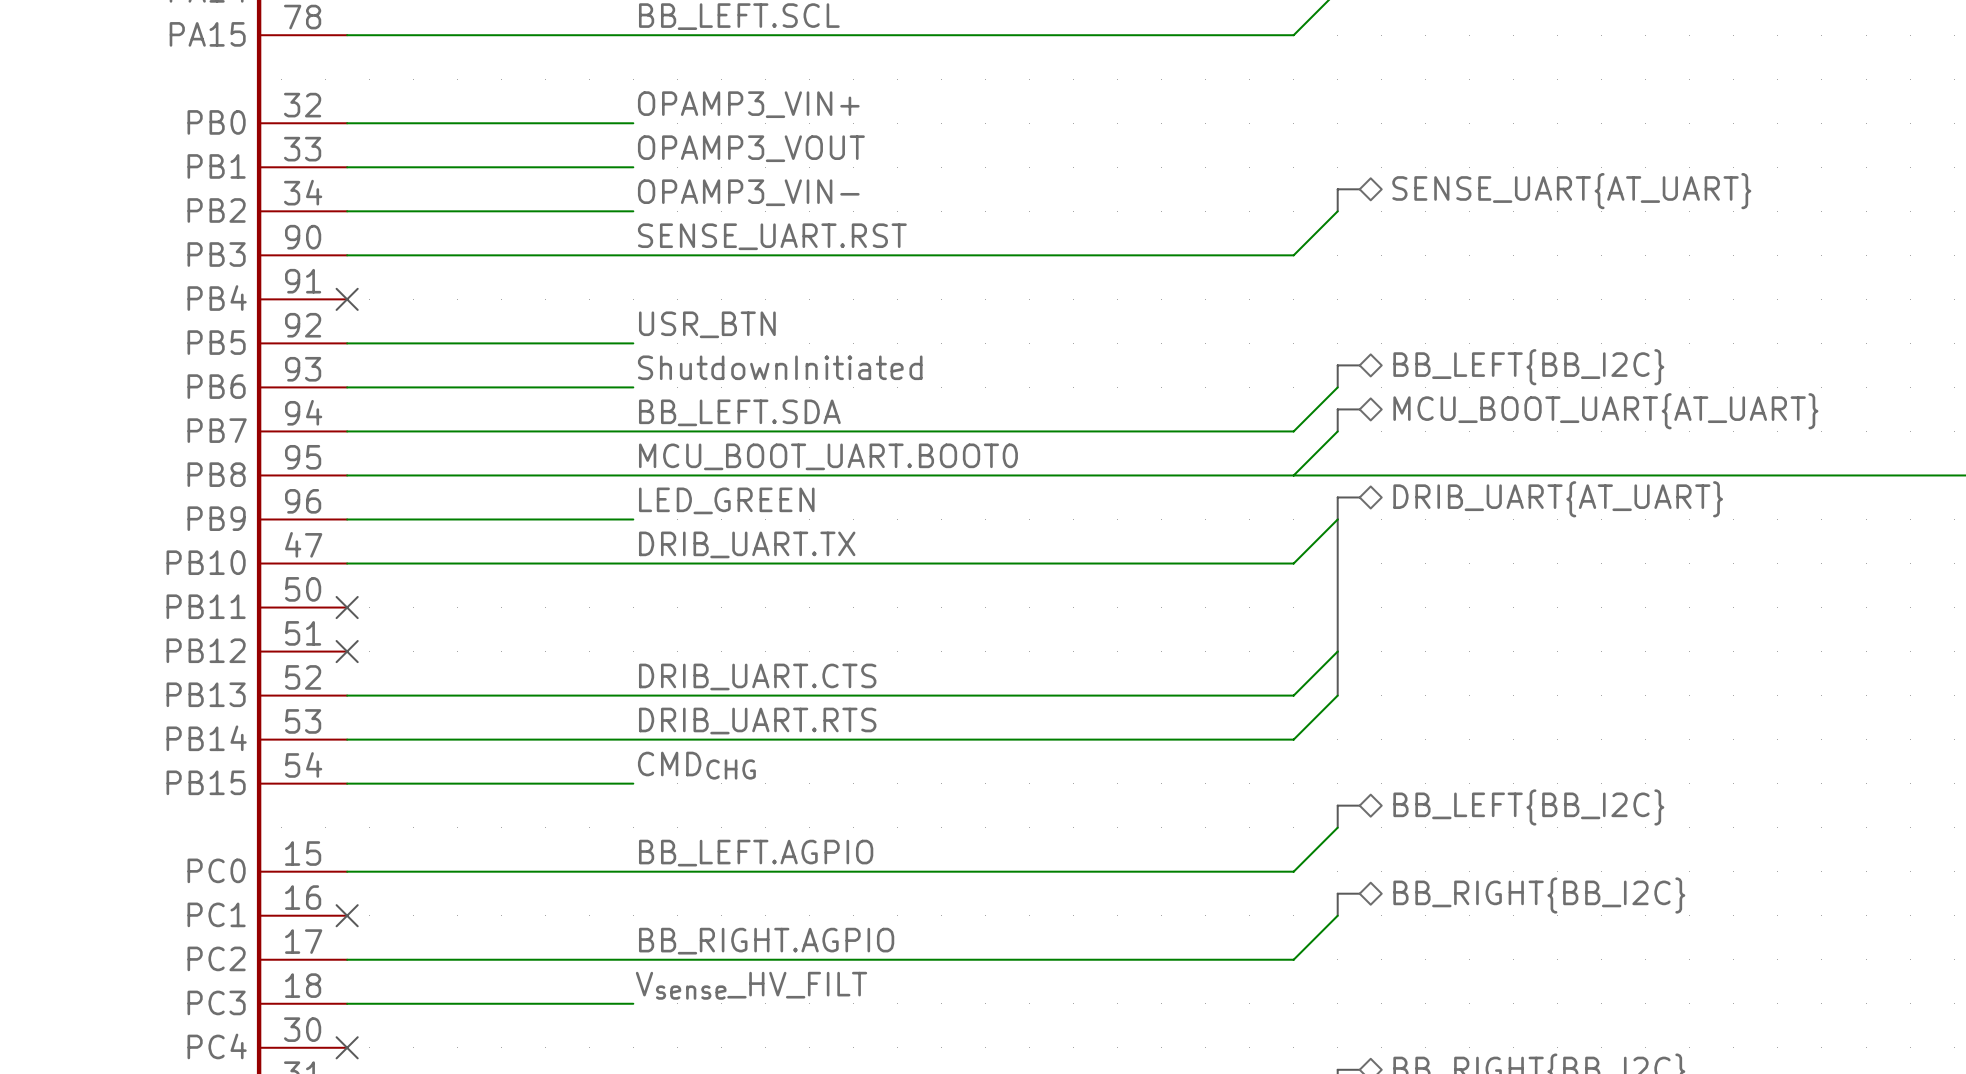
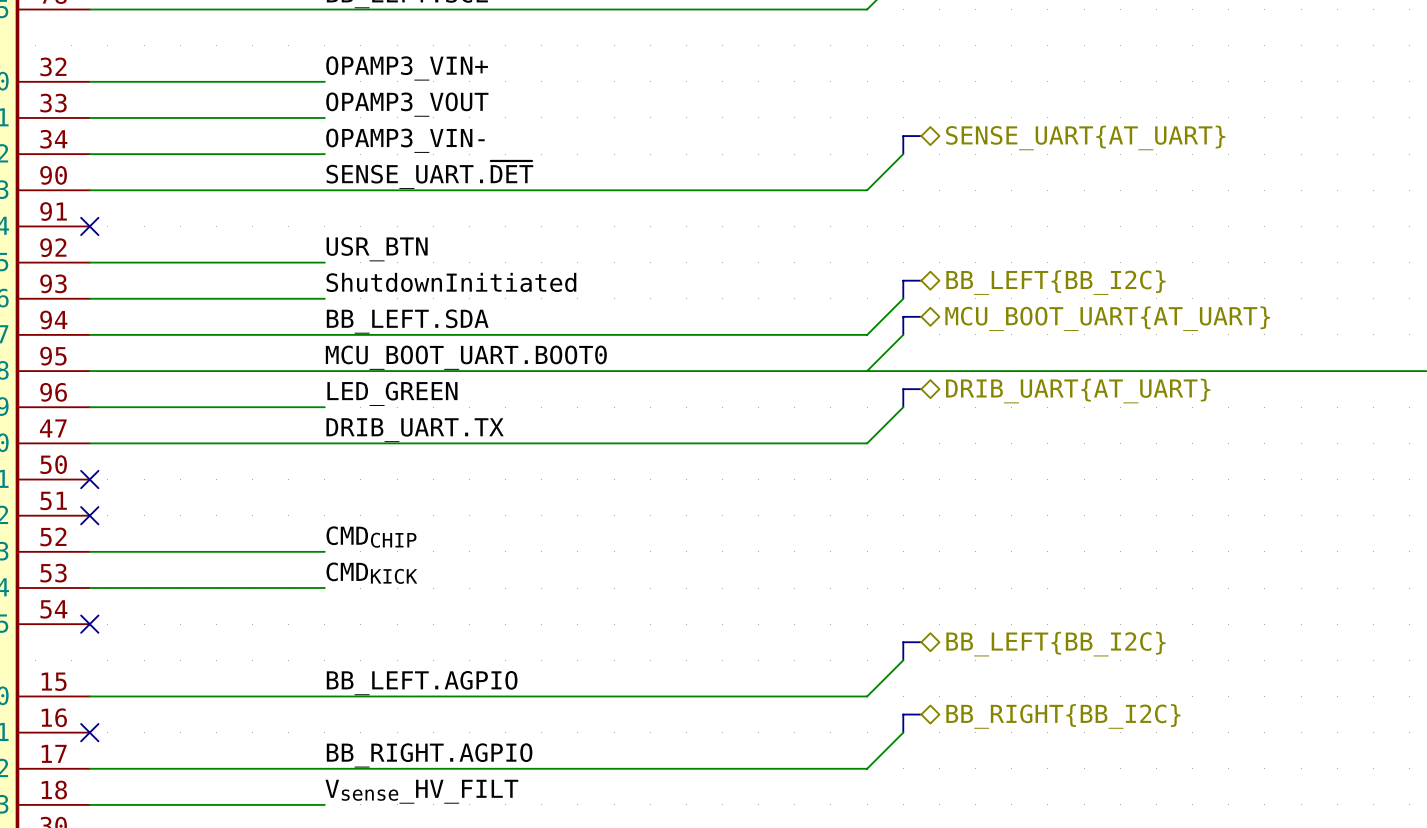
label: SENSE_UART.RST (772, 236) -> SENSE_UART.~{DET} (429, 175)
bus: (1337, 519) (1337, 695) -> none
wire: (1337, 651) (1293, 695) (633, 695) -> none
label: DRIB_UART.CTS (757, 676) -> CMDCHIP (371, 537)
wire: (1337, 695) (1293, 739) (633, 739) -> none
label: DRIB_UART.RTS (757, 721) -> CMDKICK (371, 573)
label: CMDCHG (696, 765) -> none
wire: (347, 783) (633, 783) -> none
no-connect mark: none -> (89, 624)

